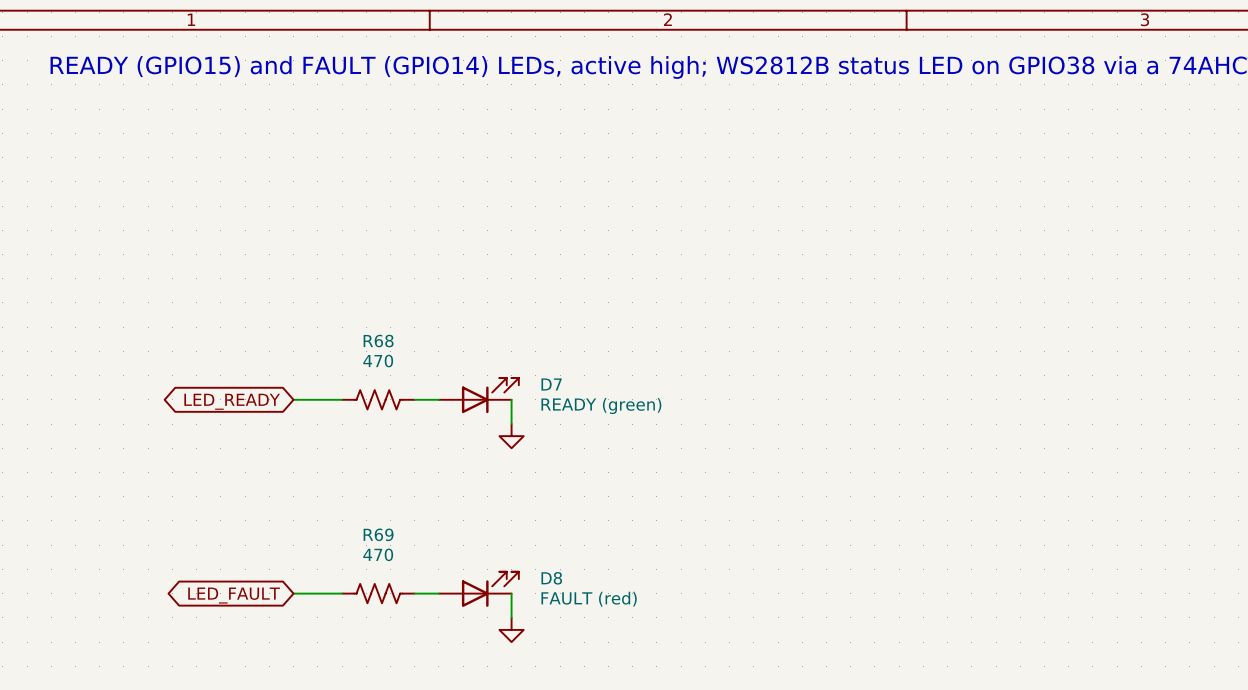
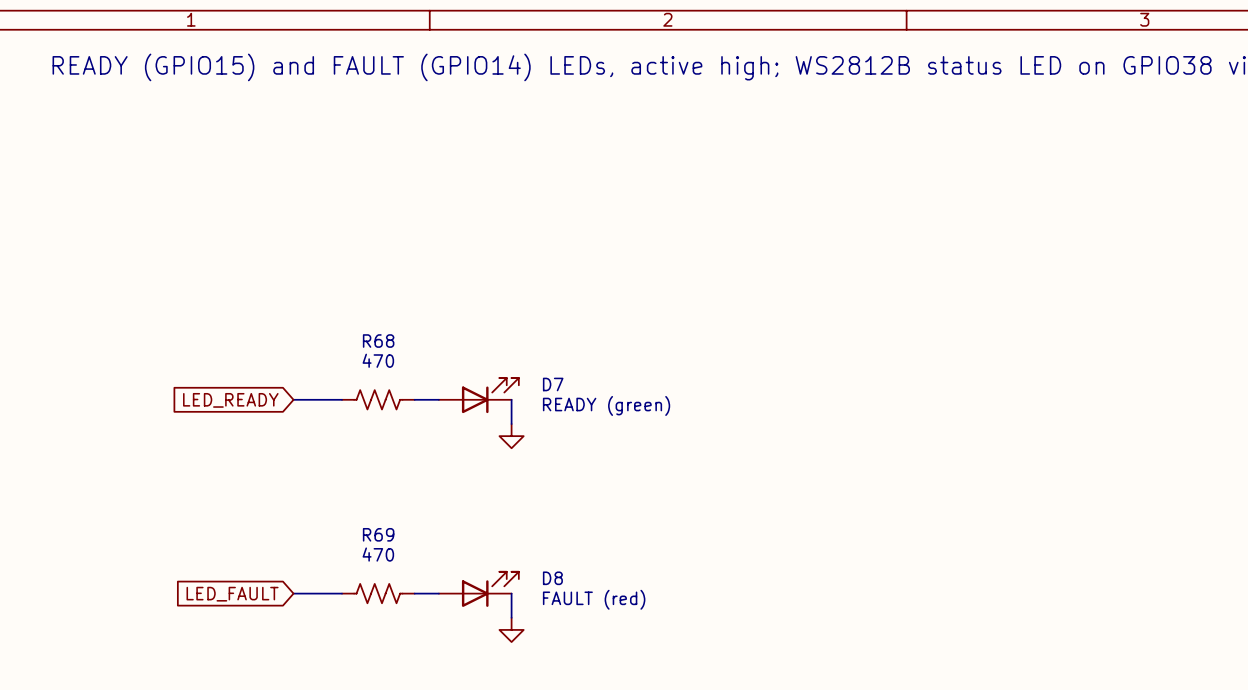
global label shape: bidirectional (232, 401) -> input (230, 400)
global label shape: bidirectional (234, 595) -> input (232, 594)

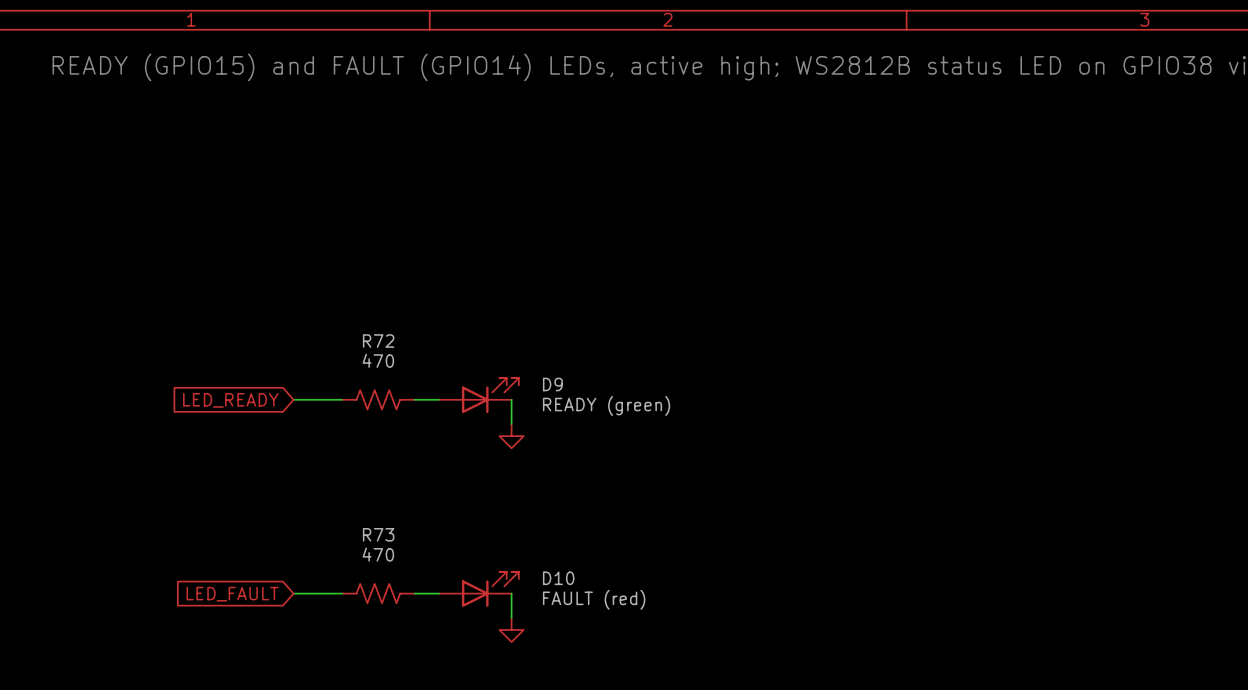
R68 name: R68 (378, 341) -> R72 (378, 341)
D7 name: D7 (553, 384) -> D9 (552, 384)
R69 name: R69 (378, 534) -> R73 (378, 534)
D8 name: D8 (552, 578) -> D10 (558, 578)

